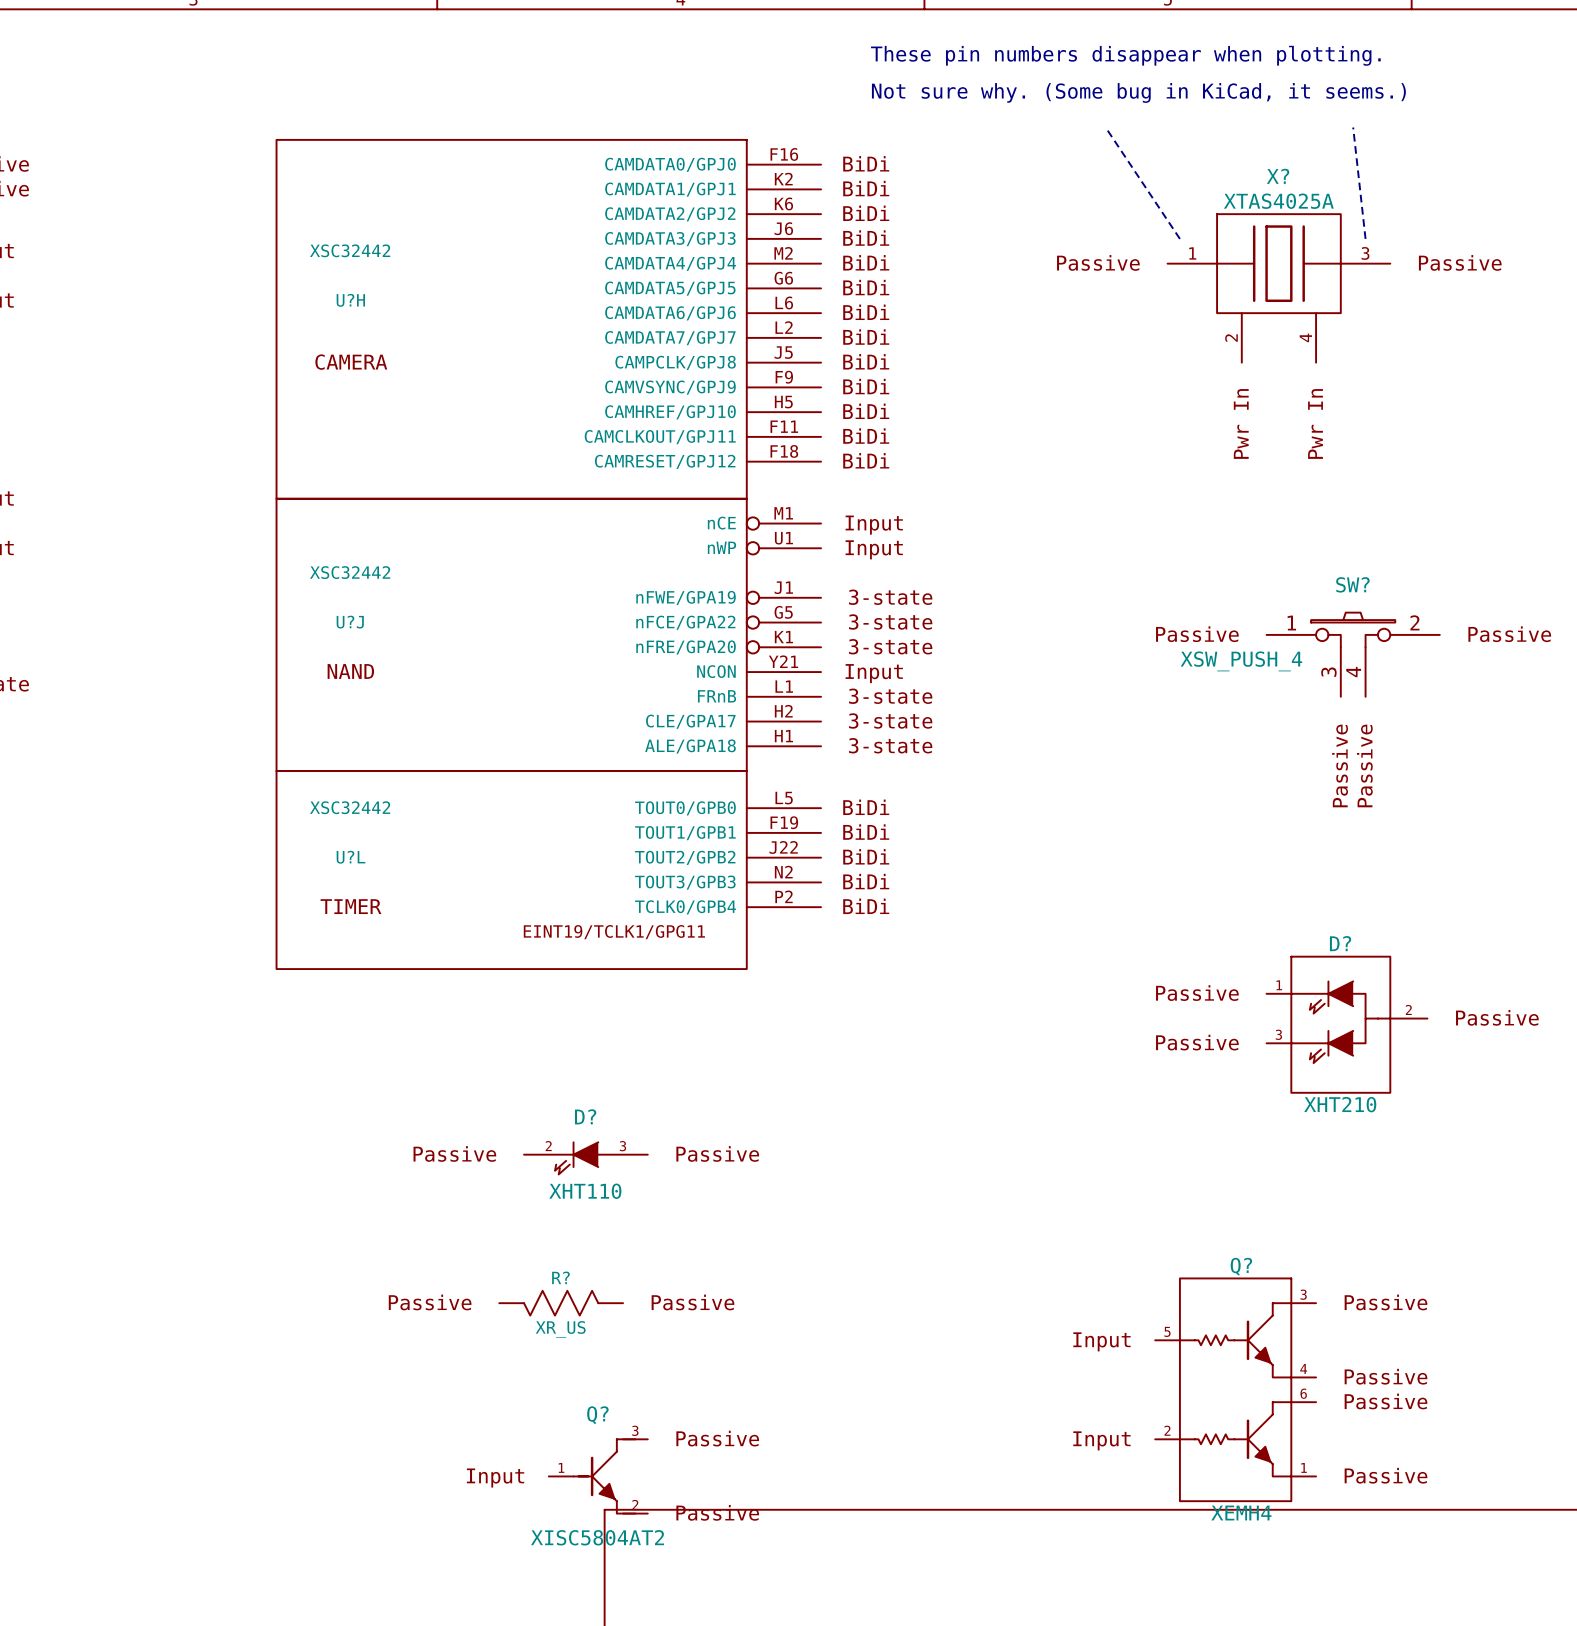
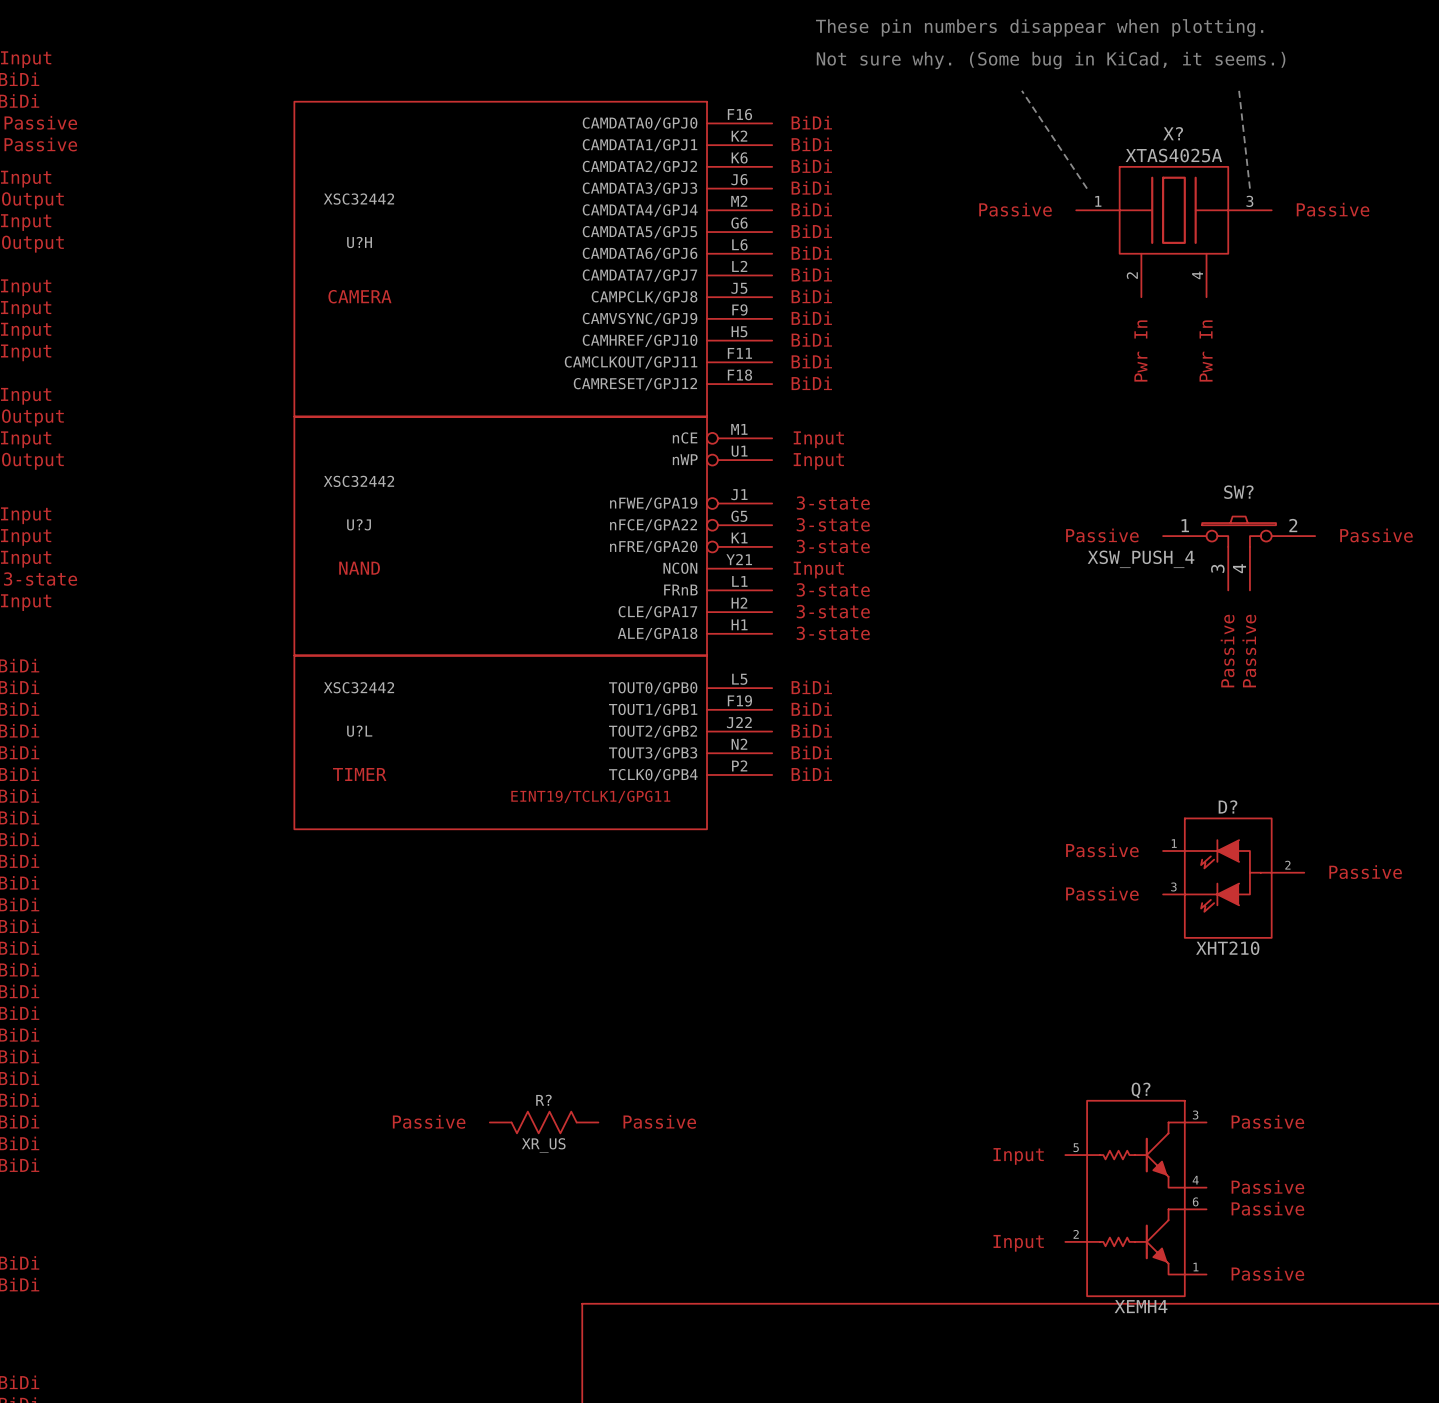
D?: XHT110 (585, 1158) -> none
Q?: XISC5804AT2 (598, 1482) -> none

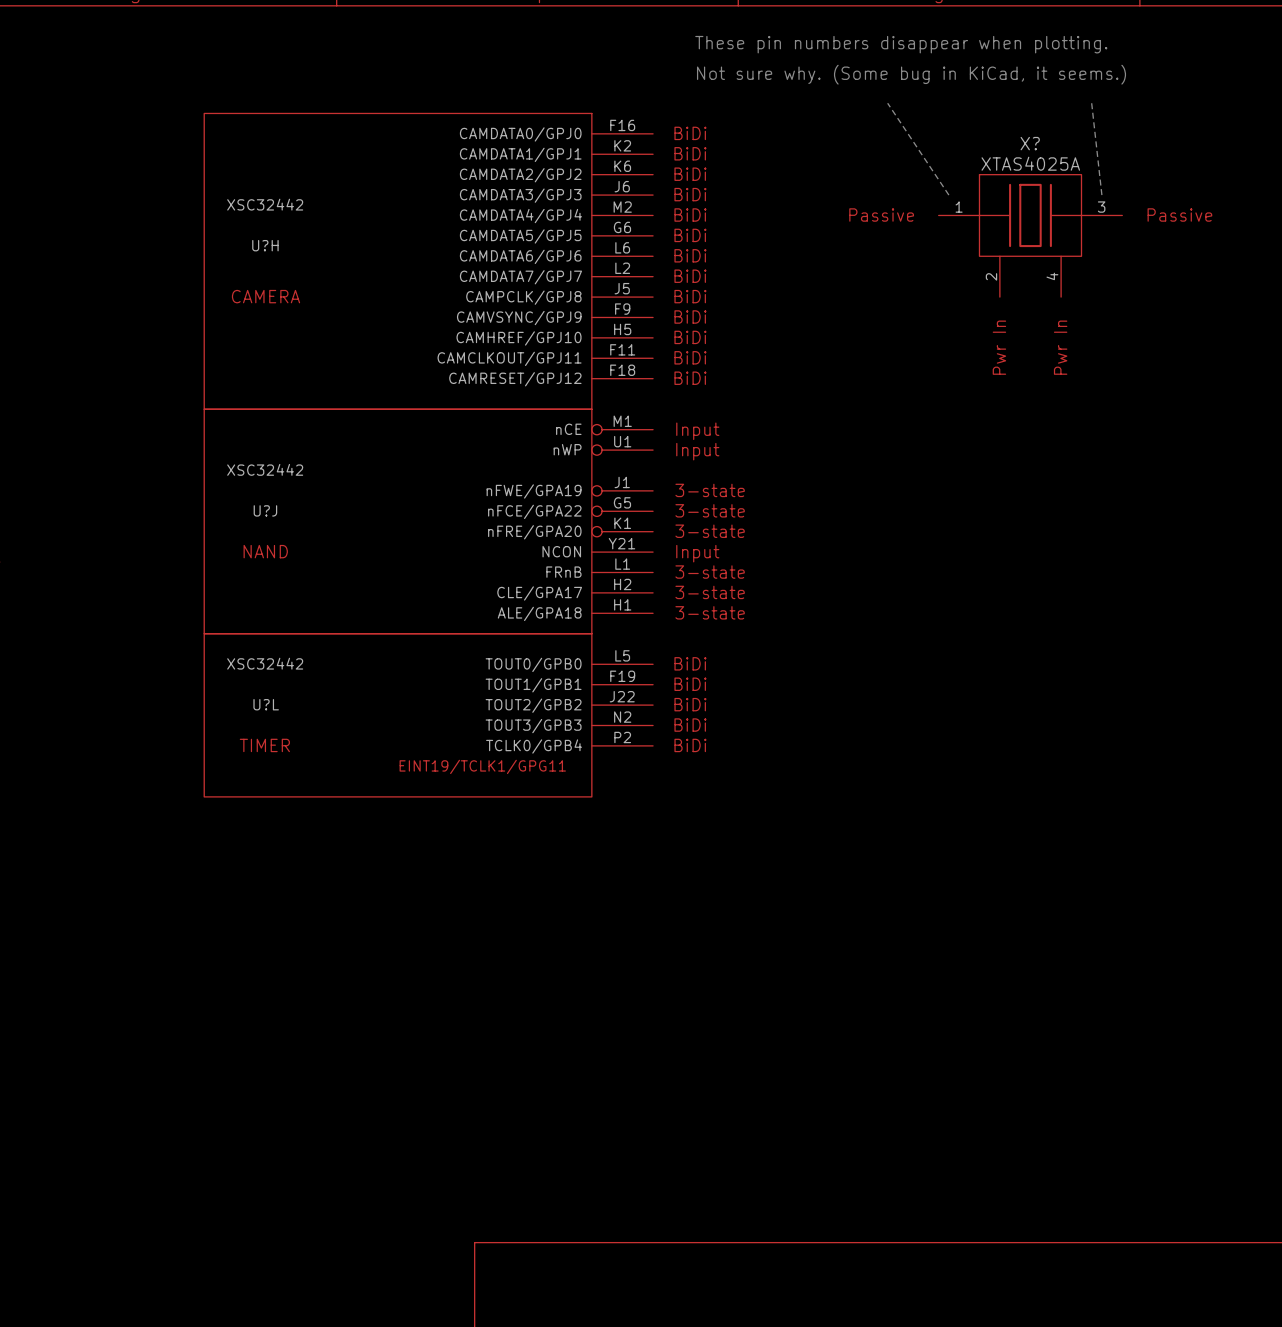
SW?: XSW_PUSH_4 (1239, 553) -> none
D?: XHT210 (1233, 878) -> none
R?: XR_US (544, 1122) -> none
Q?: XEMH4 (1135, 1198) -> none

